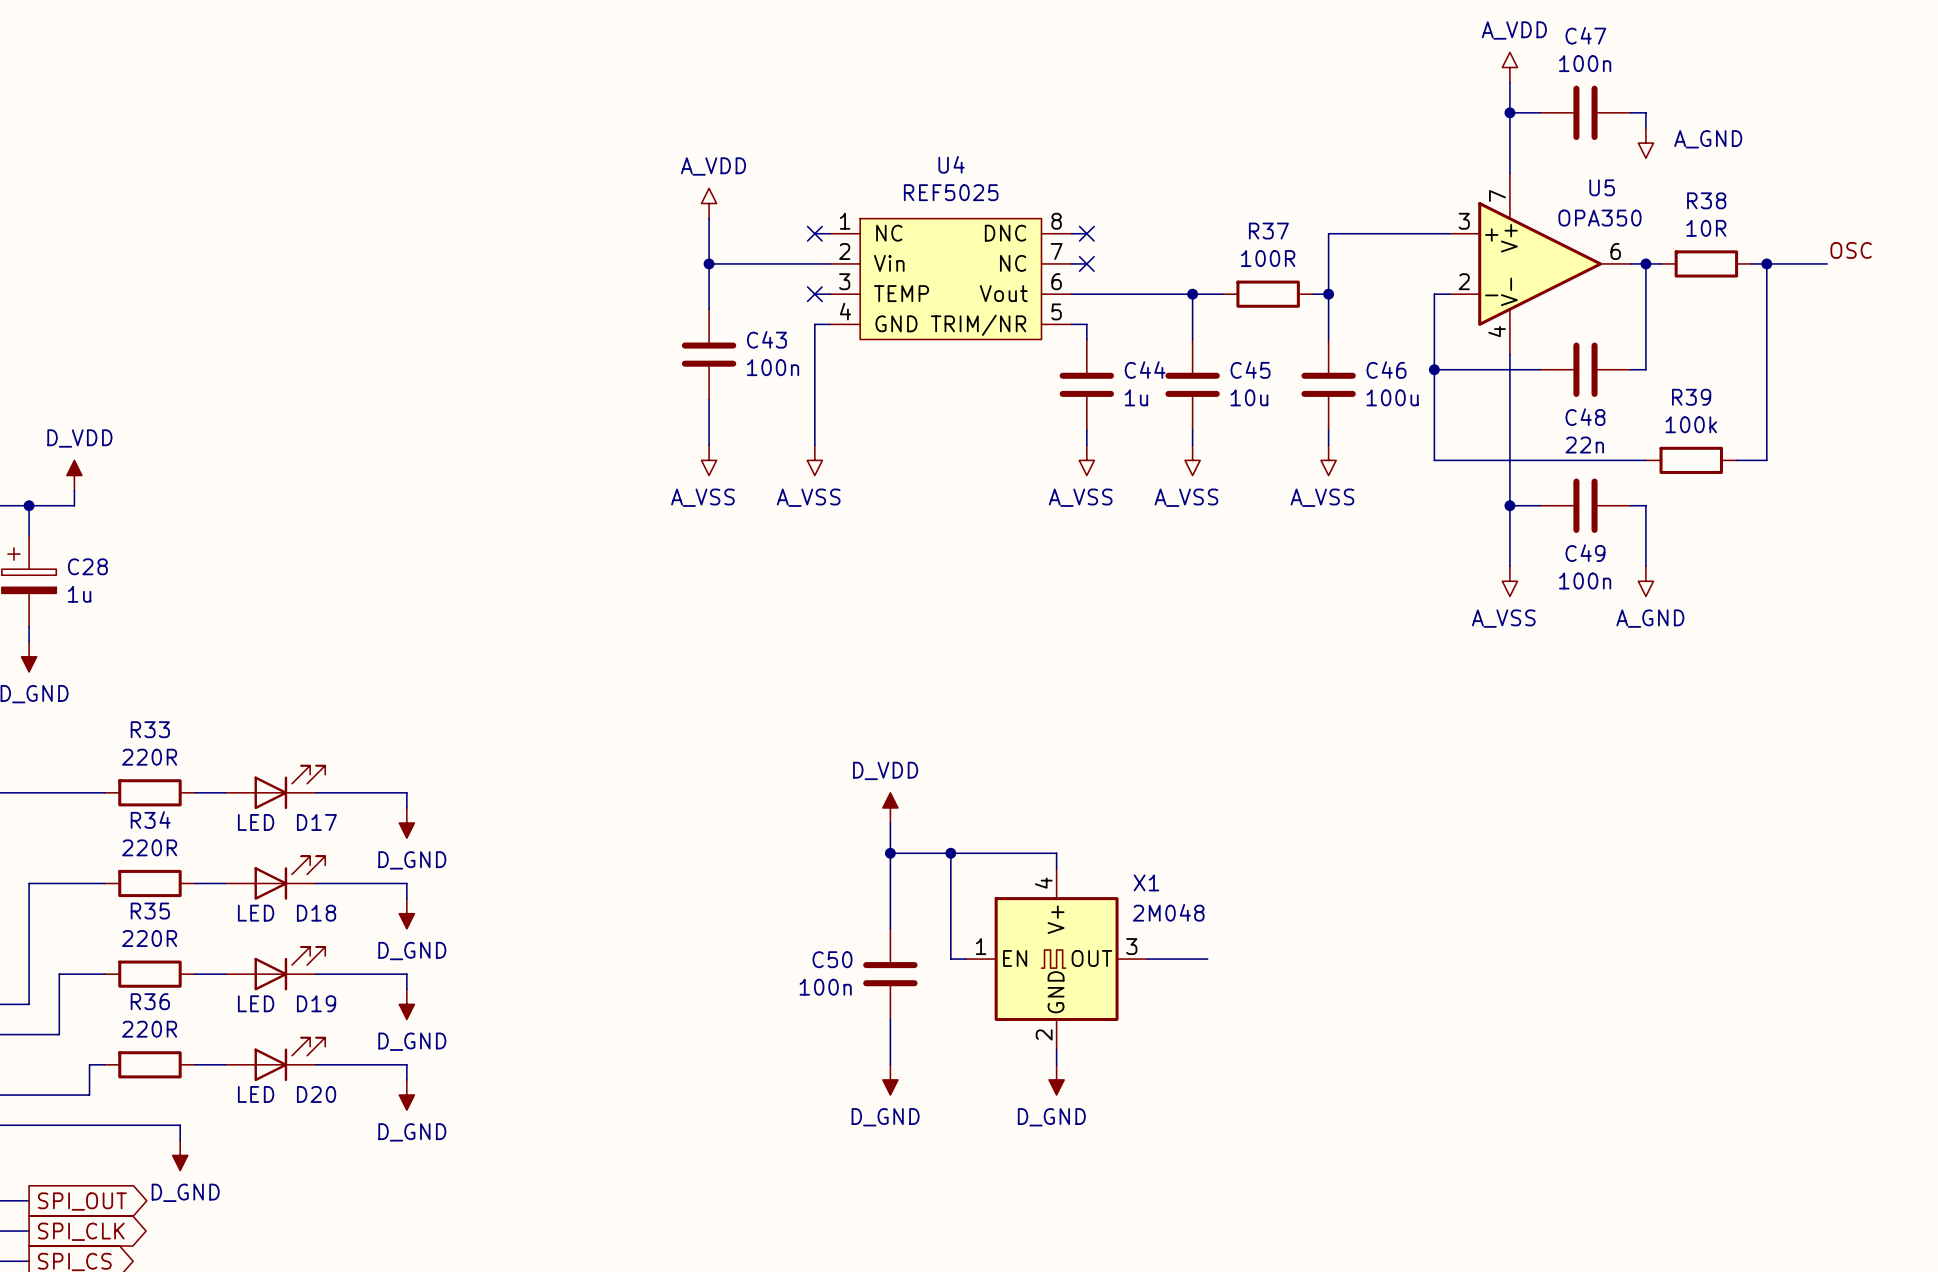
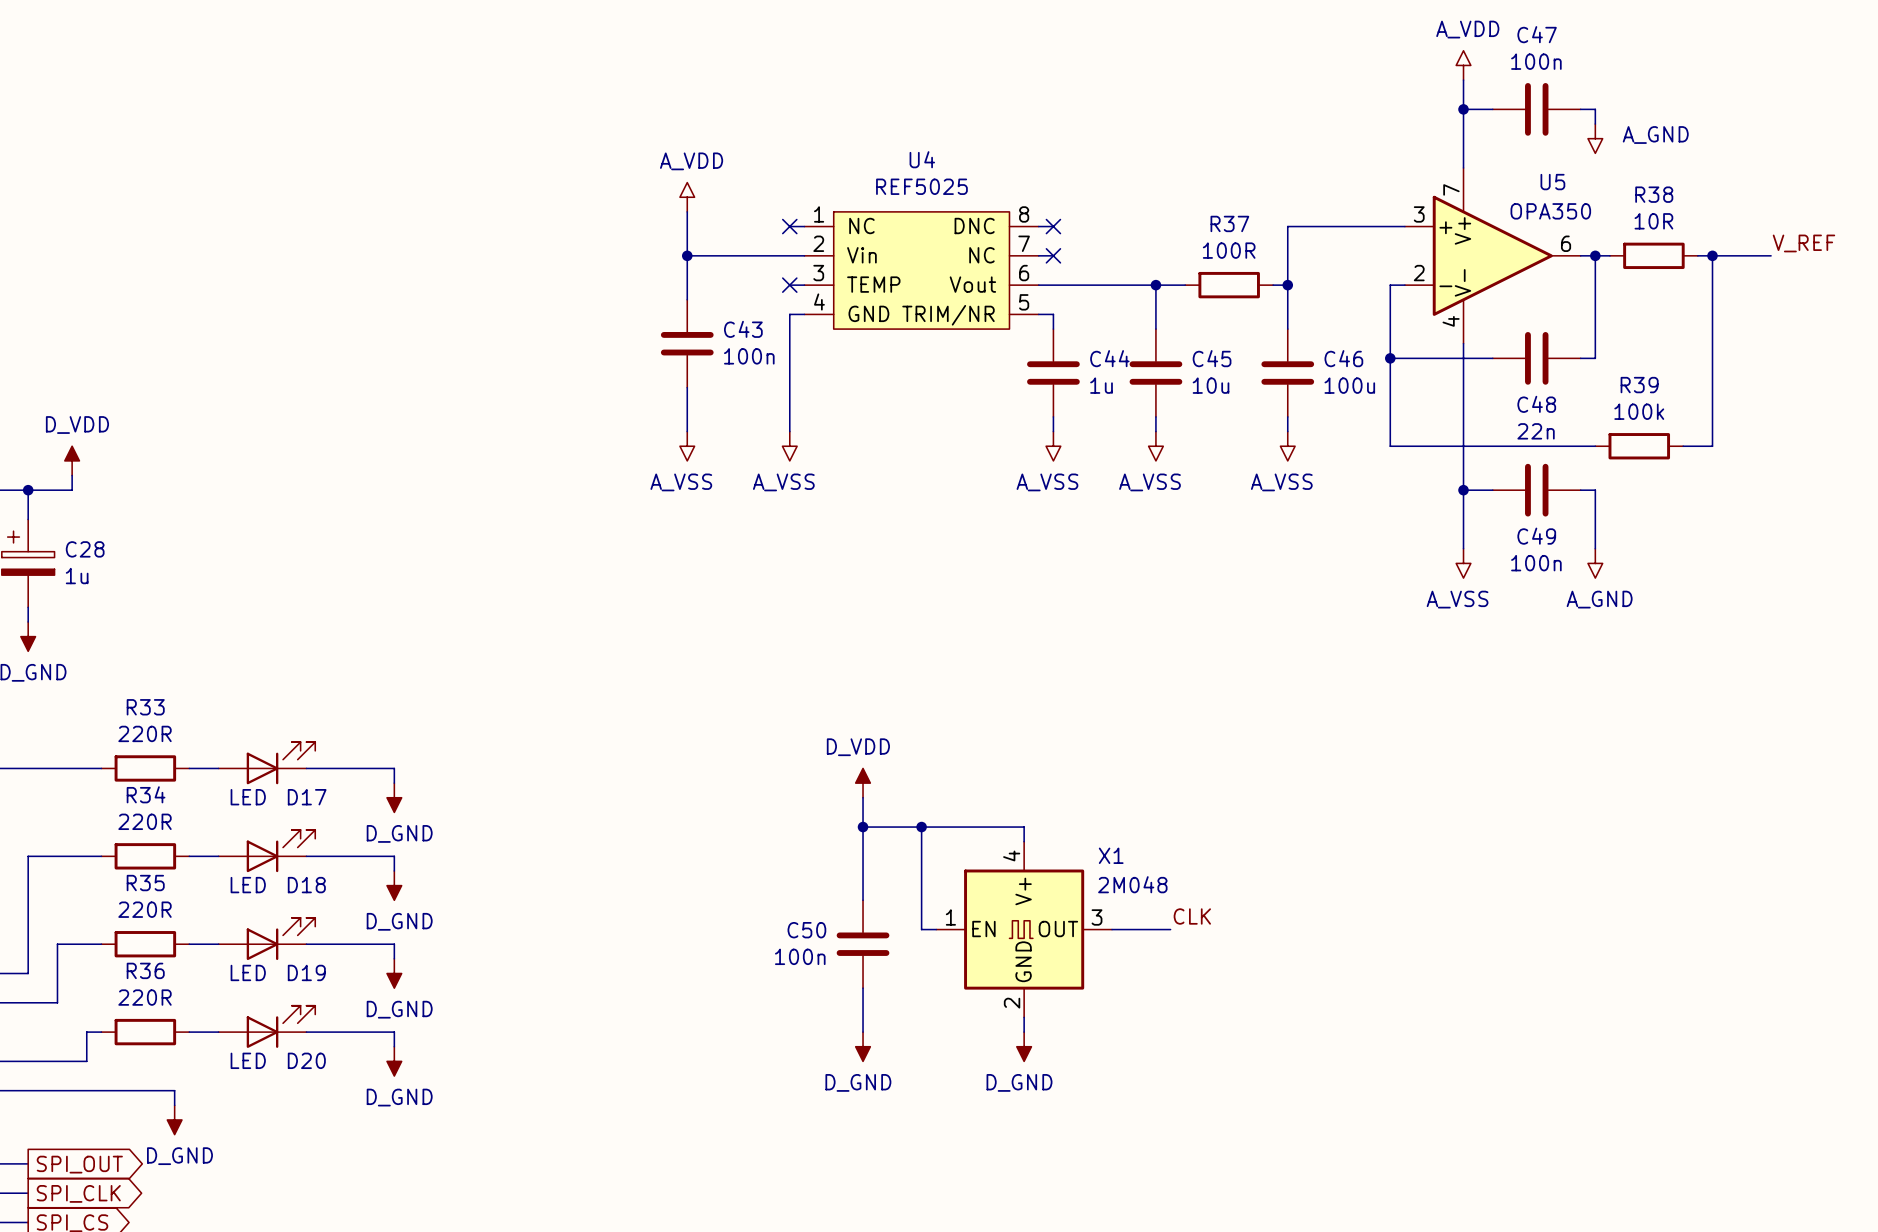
label: OSC (1851, 250) -> V_REF (1803, 243)
label: none -> CLK (1192, 916)

